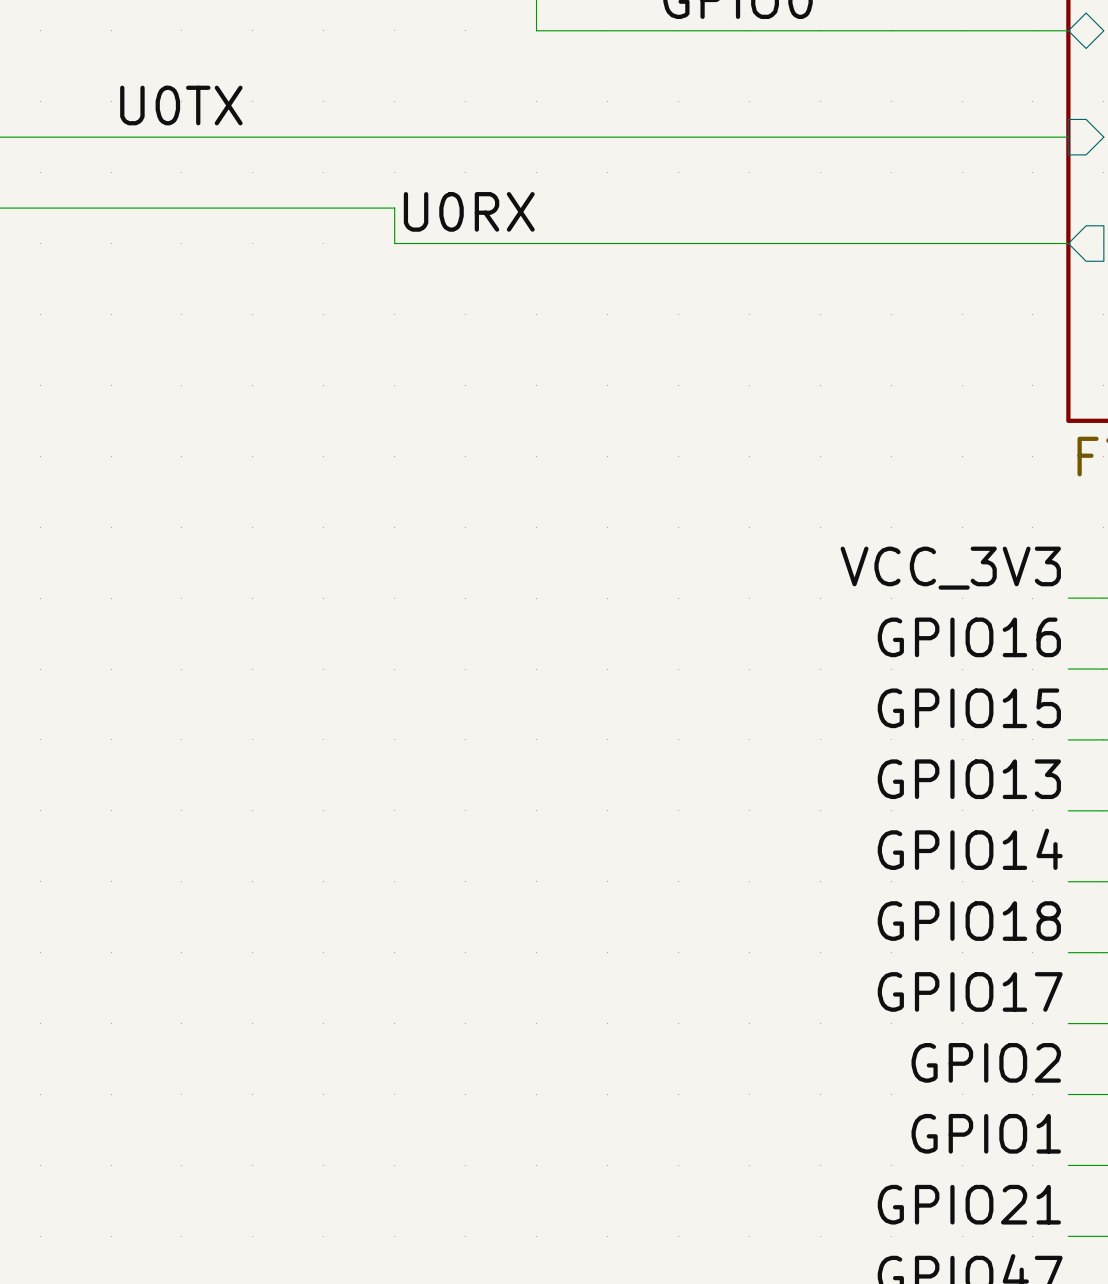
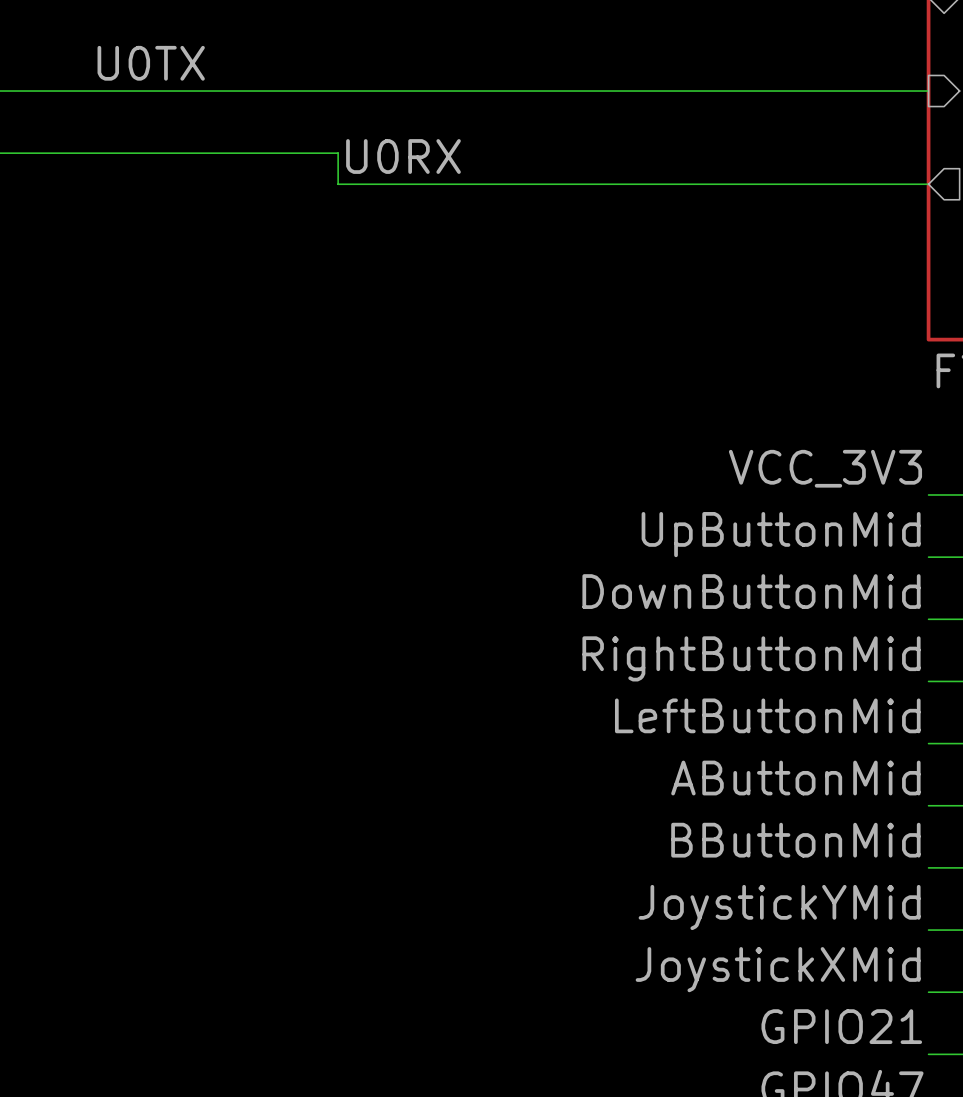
label: GPIO16 (969, 637) -> UpButtonMid (781, 534)
label: GPIO15 (969, 708) -> DownButtonMid (751, 591)
label: GPIO13 (969, 779) -> RightButtonMid (751, 658)
label: GPIO14 (970, 849) -> LeftButtonMid (767, 715)
label: GPIO18 (969, 921) -> AButtonMid (795, 778)
label: GPIO17 (970, 991) -> BButtonMid (795, 840)
label: GPIO2 (986, 1062) -> JoystickYMid (779, 907)
label: GPIO1 (986, 1133) -> JoystickXMid (778, 969)

